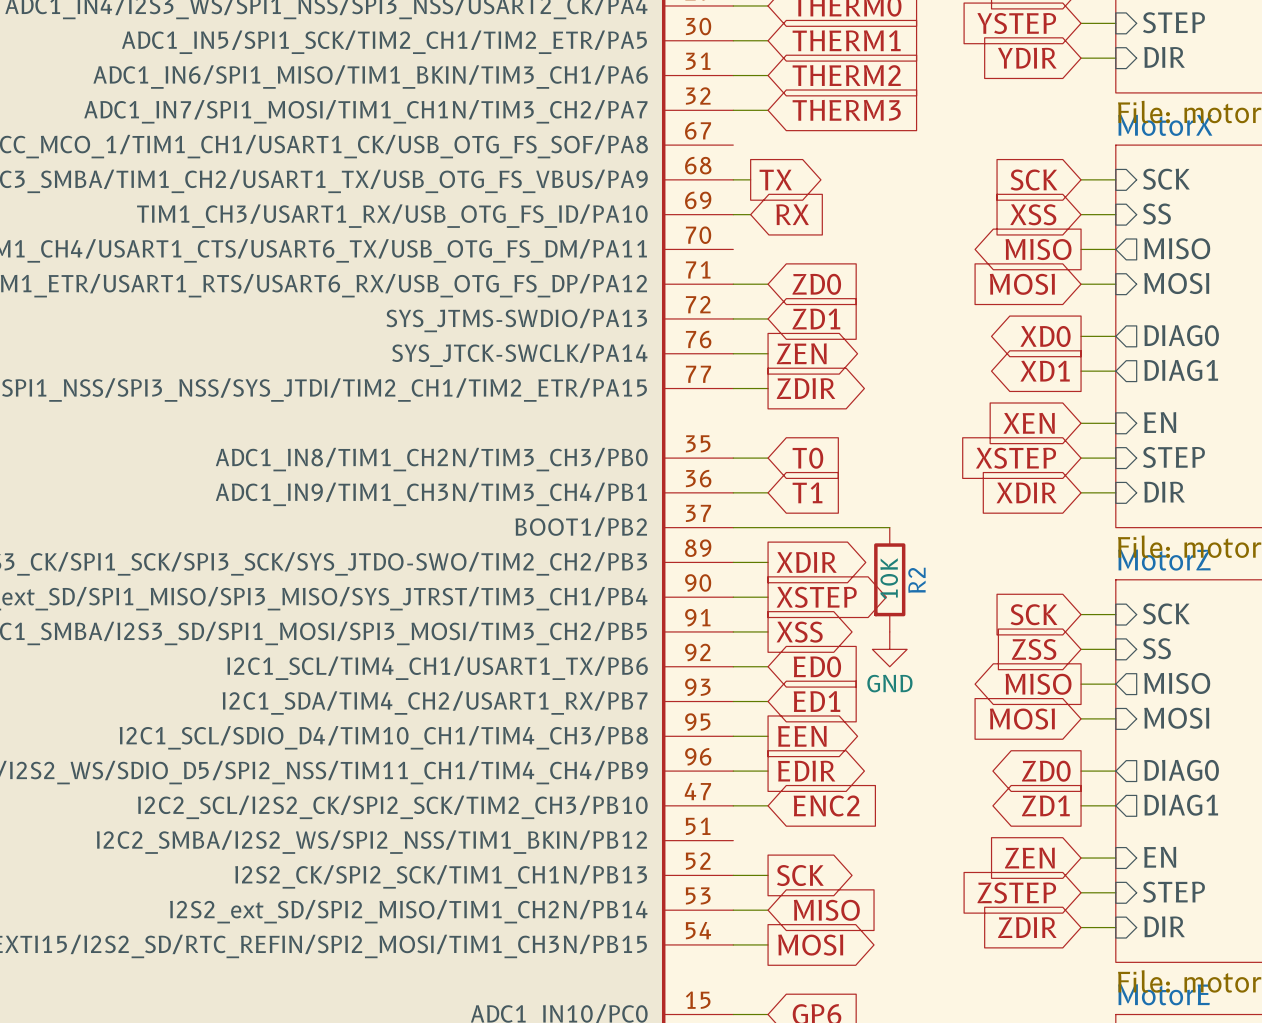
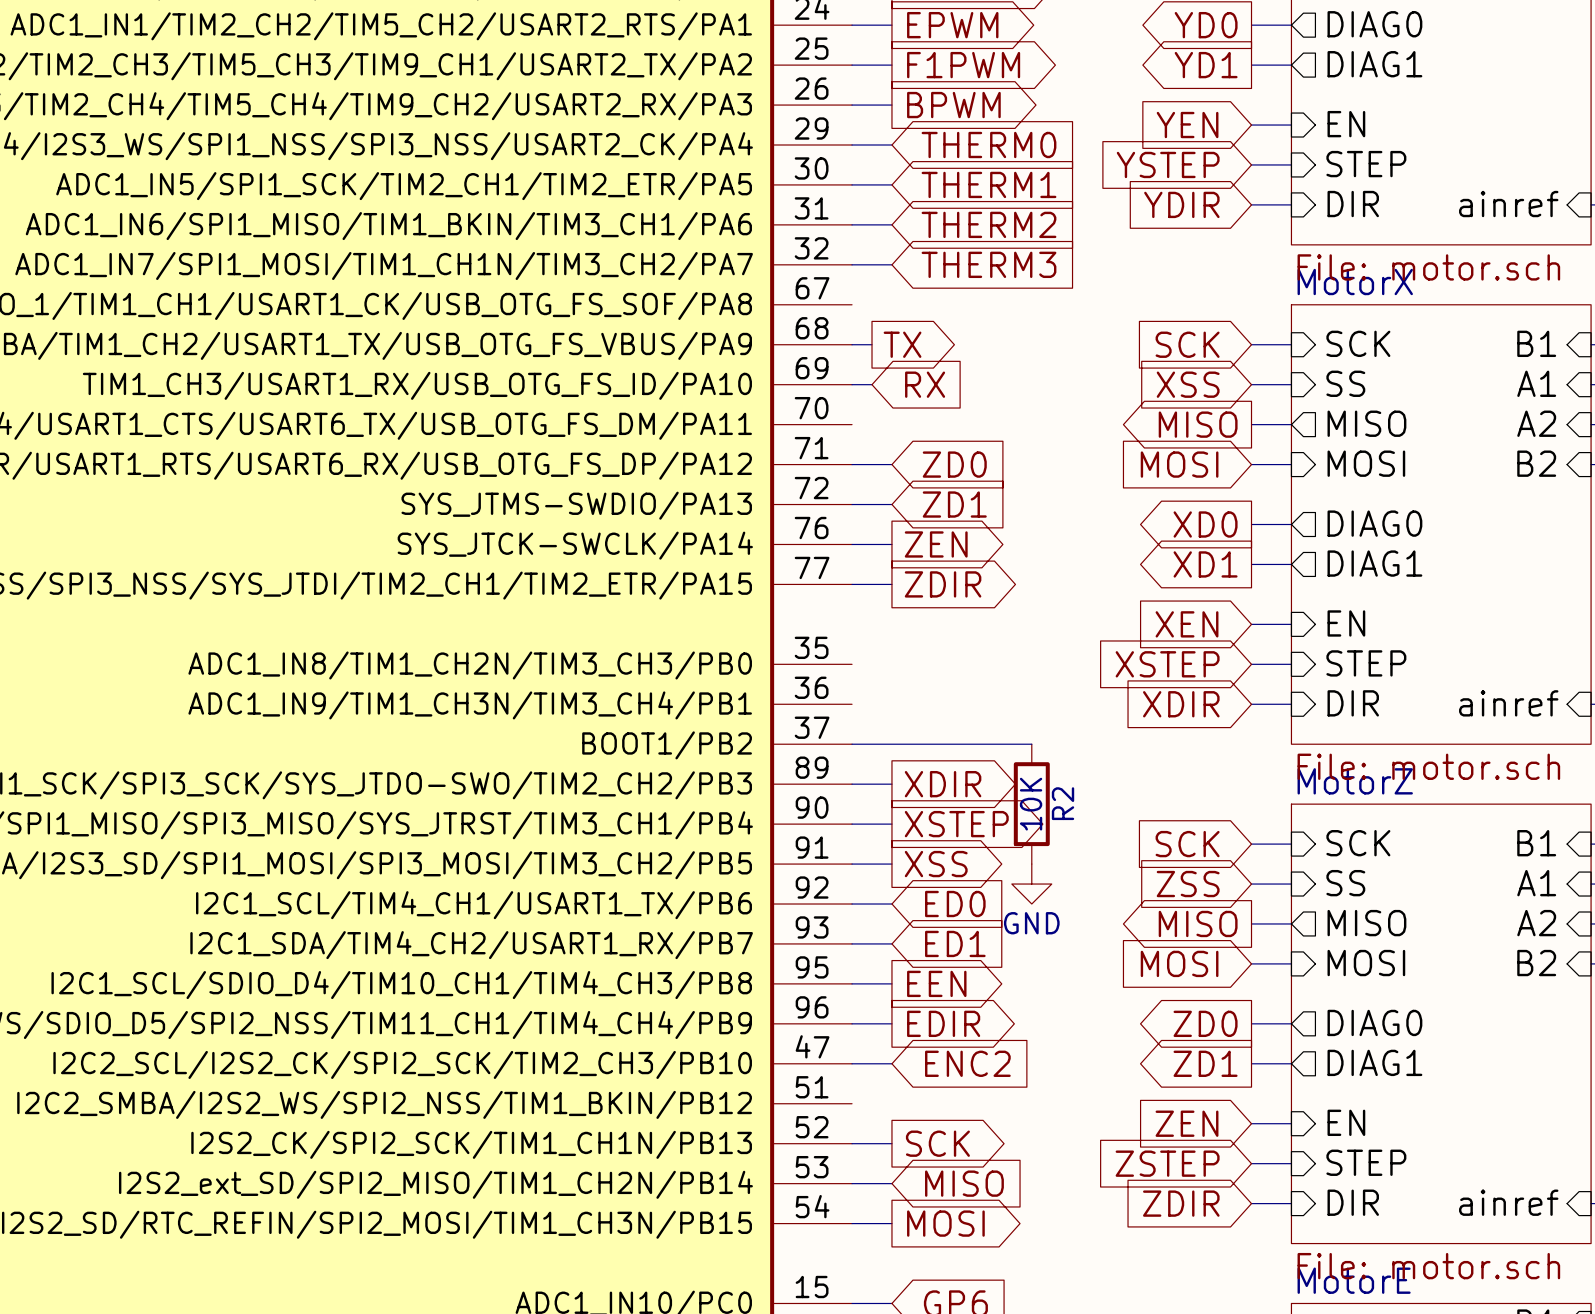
wire: (733, 458) (768, 458) -> none
global label: T0 (807, 458) -> none
wire: (733, 492) (768, 492) -> none
global label: T1 (807, 492) -> none

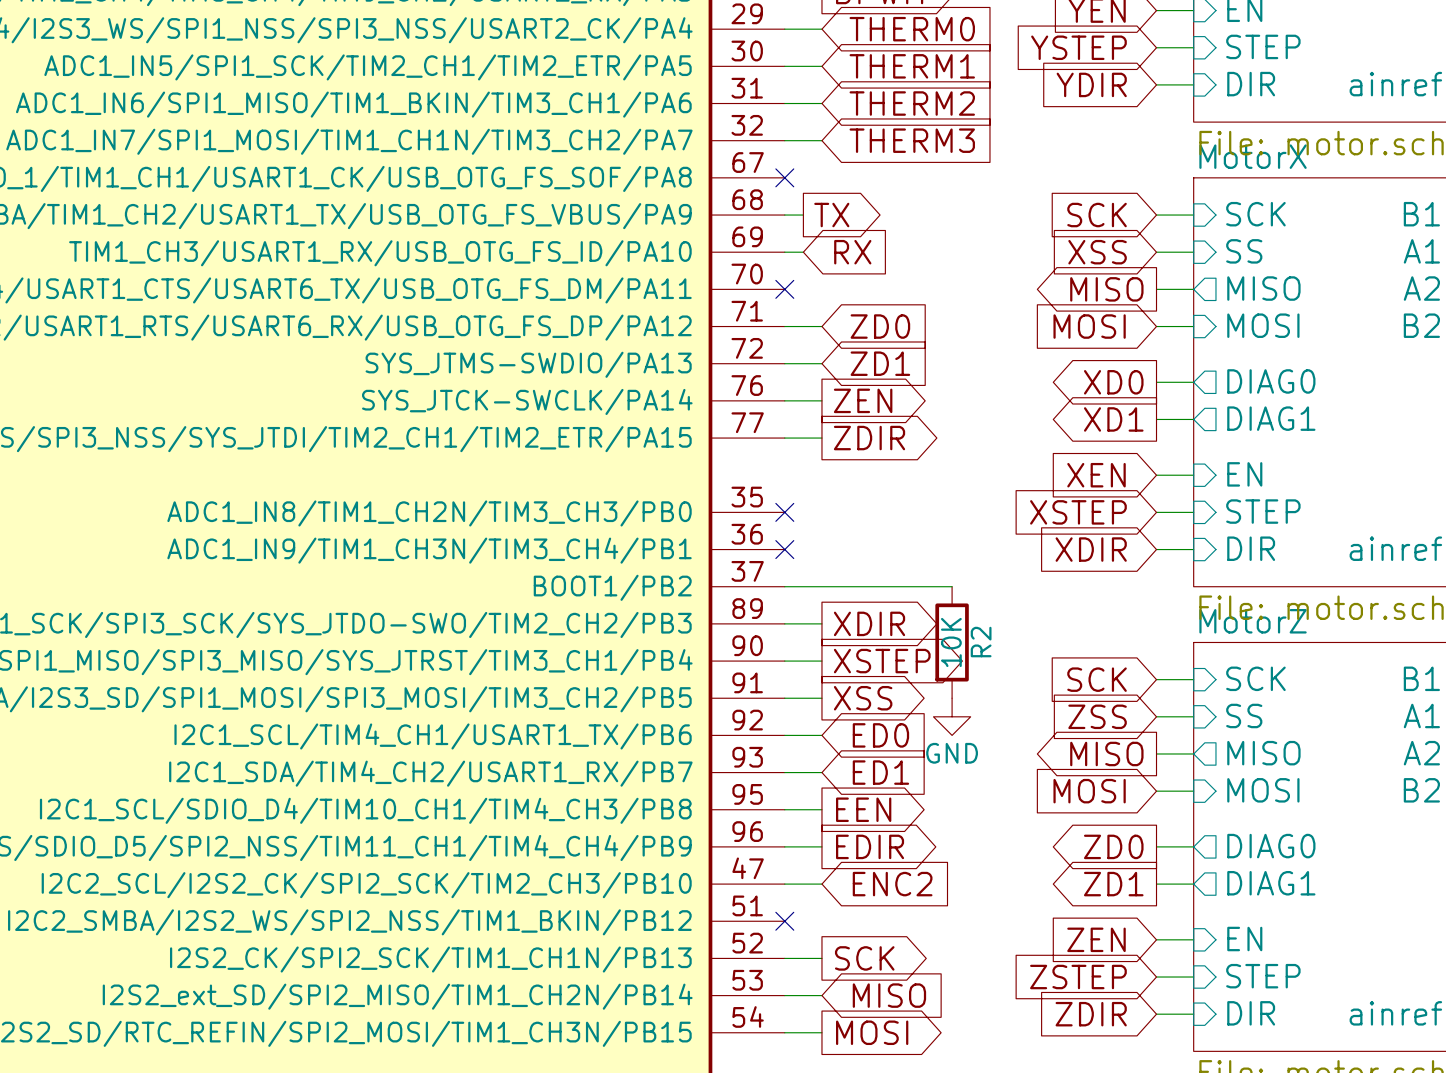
no-connect mark: none -> (784, 177)
no-connect mark: none -> (784, 289)
no-connect mark: none -> (784, 512)
no-connect mark: none -> (784, 549)
no-connect mark: none -> (784, 921)

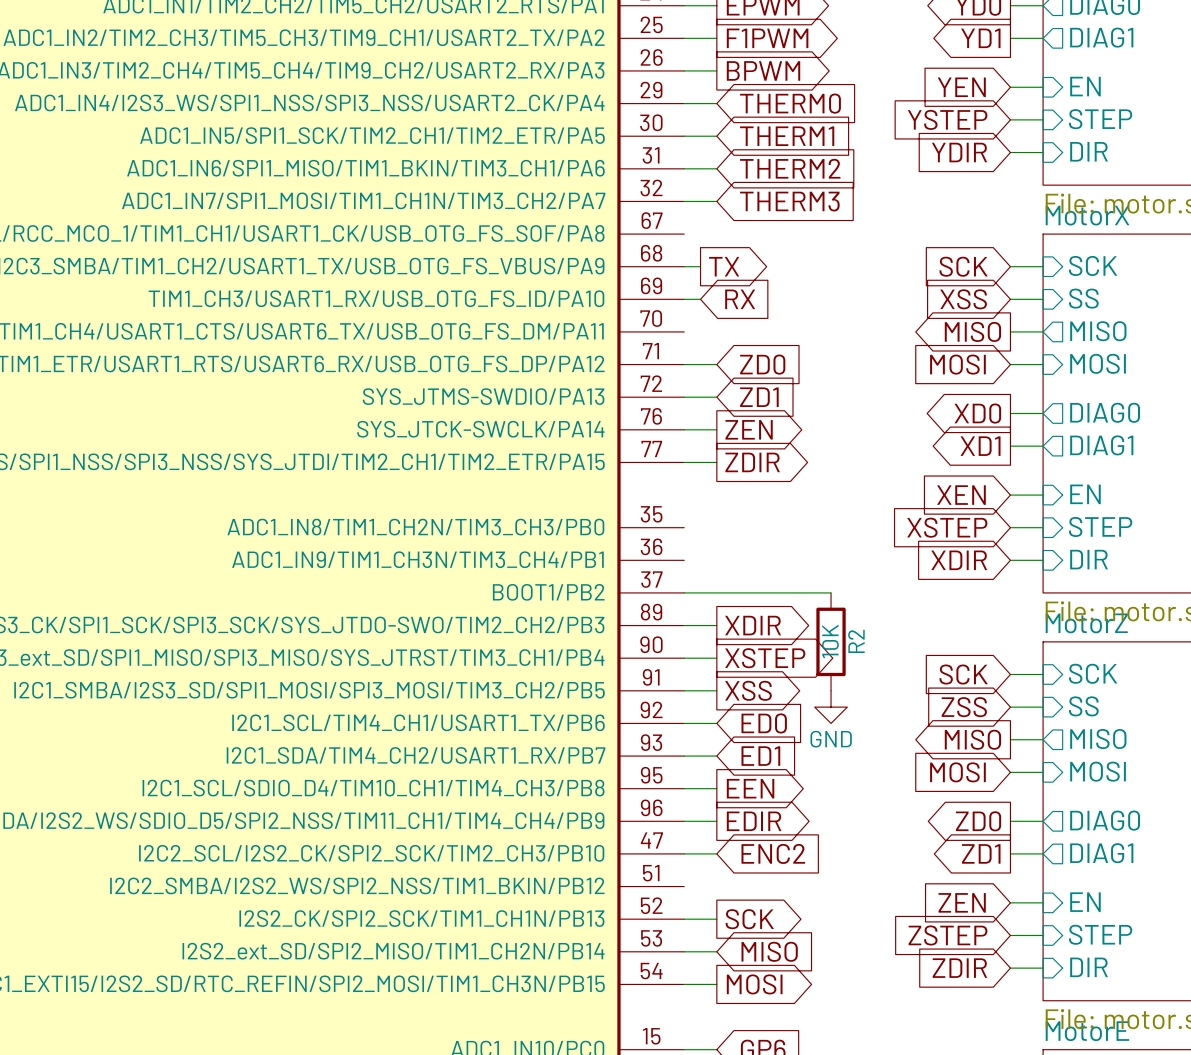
no-connect mark: (784, 177) -> none
no-connect mark: (784, 289) -> none
no-connect mark: (784, 512) -> none
no-connect mark: (784, 549) -> none
no-connect mark: (784, 921) -> none

